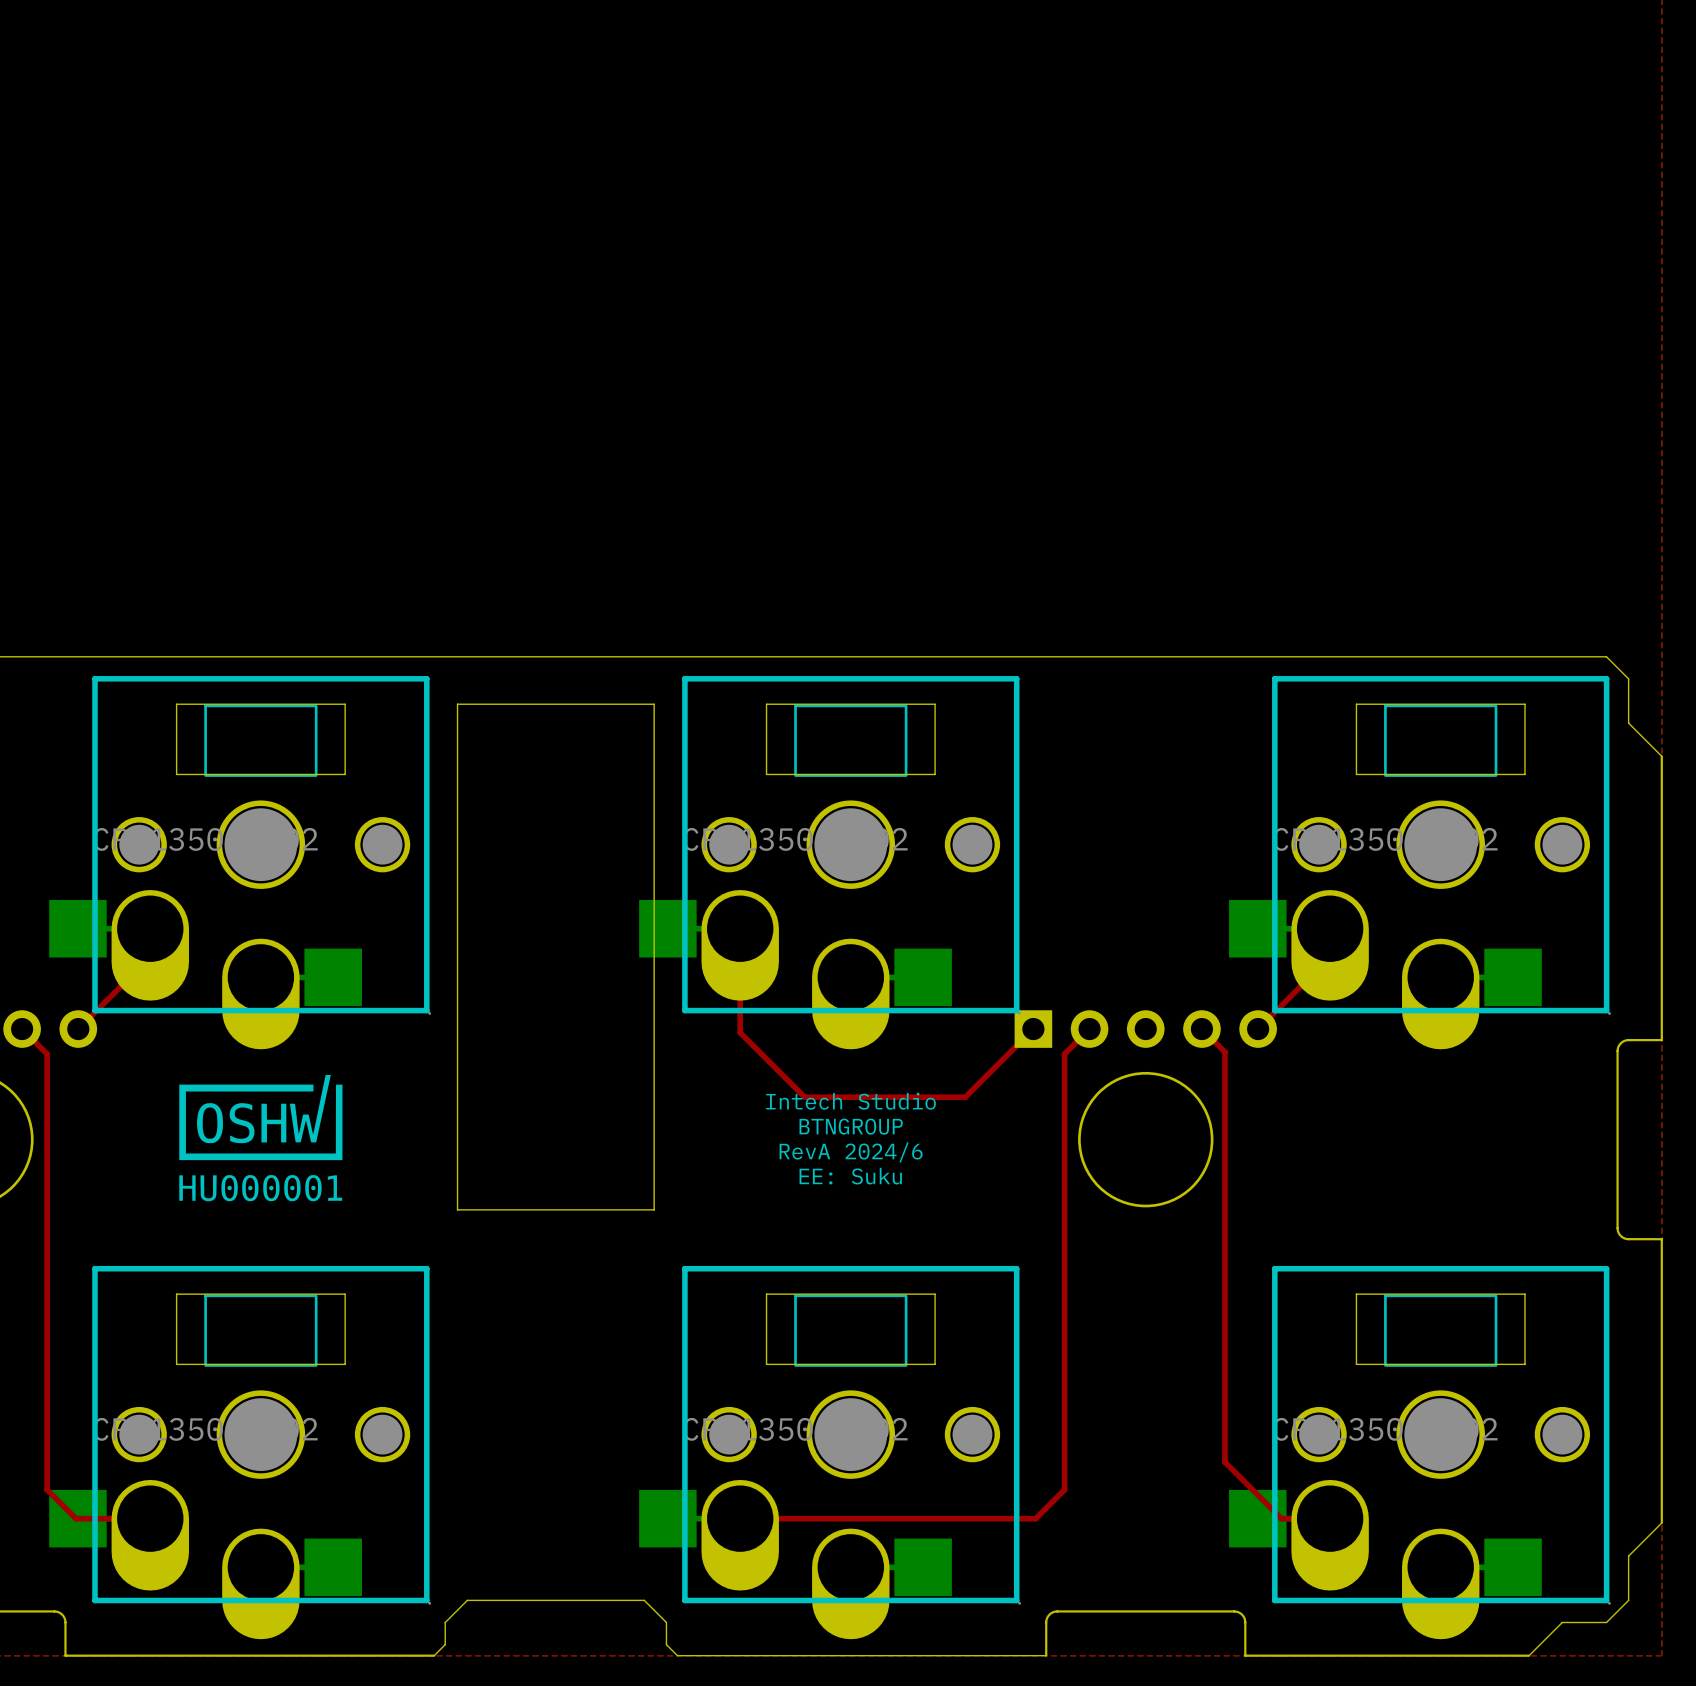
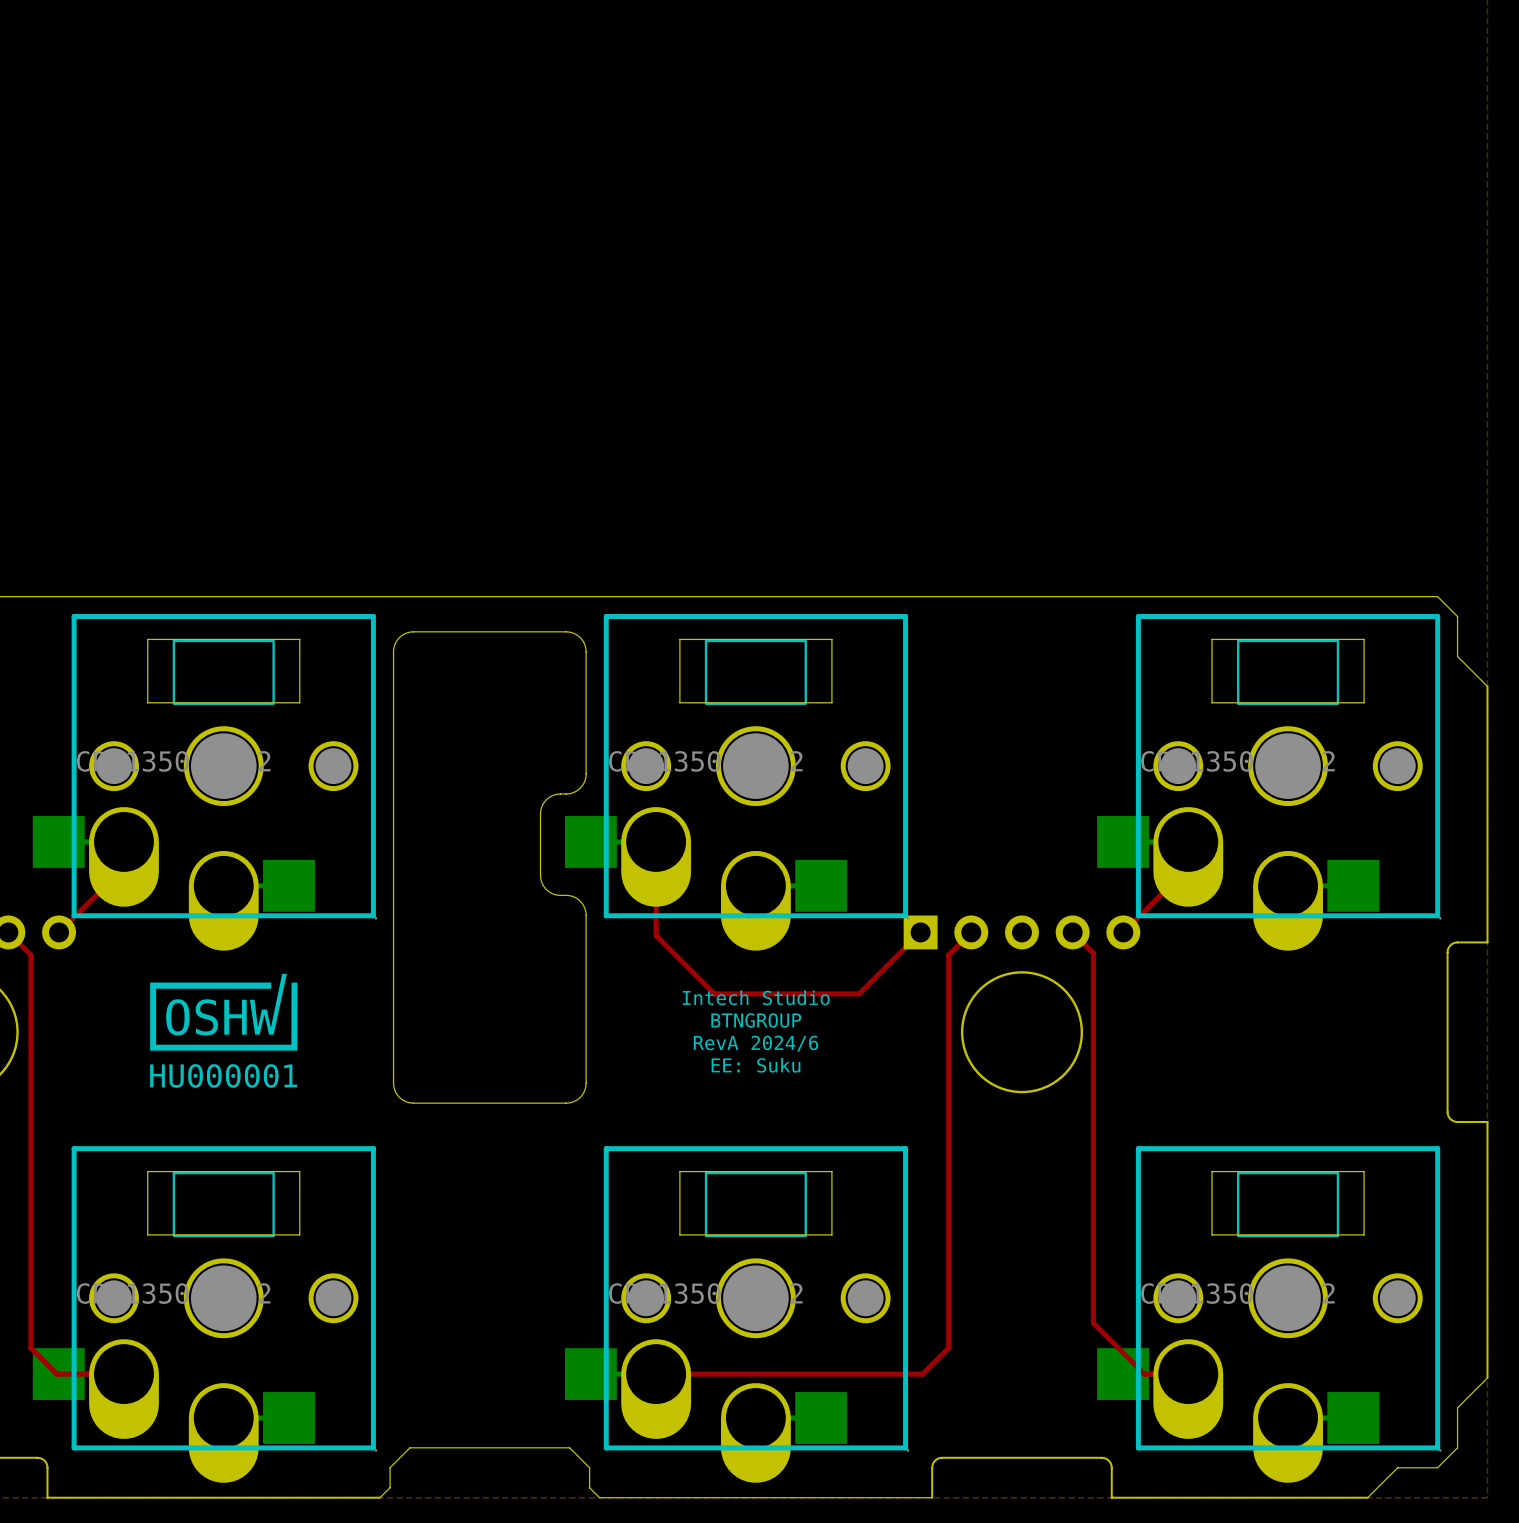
board edge: (457, 704) (654, 704) (654, 1209) (457, 1209) (457, 704) -> (413, 631) (399, 637) (393, 651) (394, 1089) (401, 1098) (411, 1103) (572, 1102) (581, 1095) (586, 1085) (586, 913) (583, 904) (576, 898) (551, 893) (542, 884) (540, 875) (540, 813) (542, 805) (548, 798) (556, 794) (574, 792) (581, 786) (585, 778) (585, 645) (578, 636) (568, 631) (413, 631)

